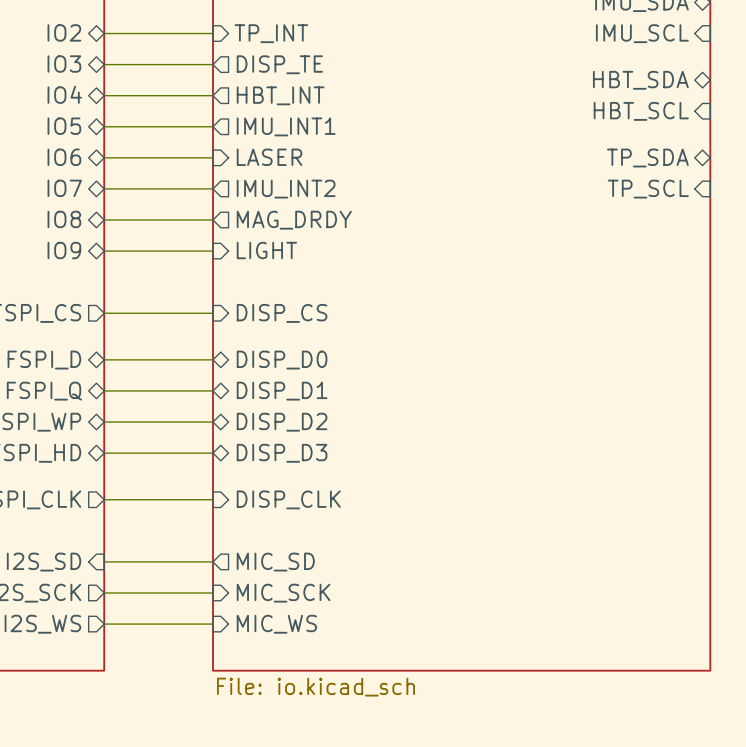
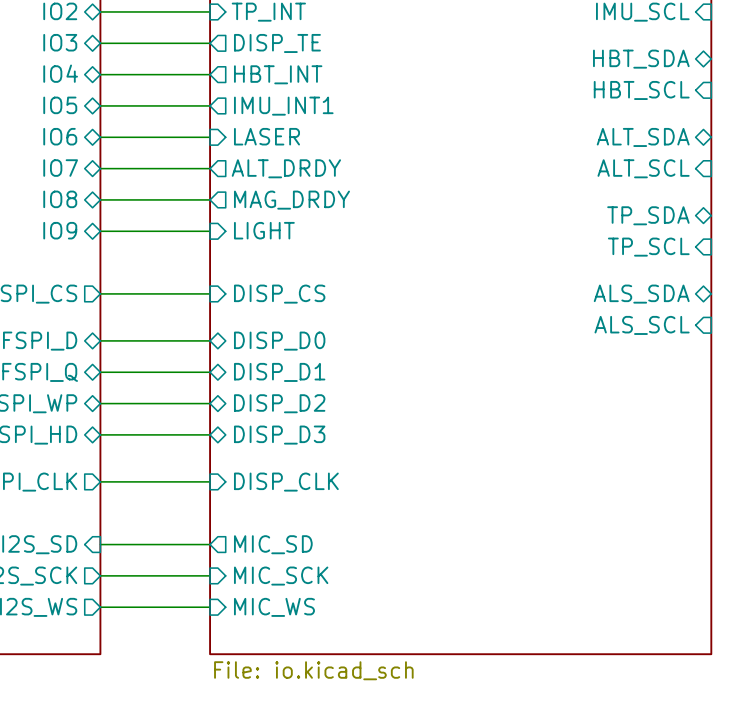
sheet pin: TP_SDA (647, 158) -> ALT_SDA (643, 137)
sheet pin: IMU_INT2 (286, 189) -> ALT_DRDY (286, 168)
sheet pin: TP_SCL (648, 189) -> ALT_SCL (643, 168)
sheet pin: none -> TP_SDA (648, 215)
sheet pin: none -> TP_SCL (648, 247)
sheet pin: none -> ALS_SDA (641, 294)
sheet pin: none -> ALS_SCL (642, 325)

